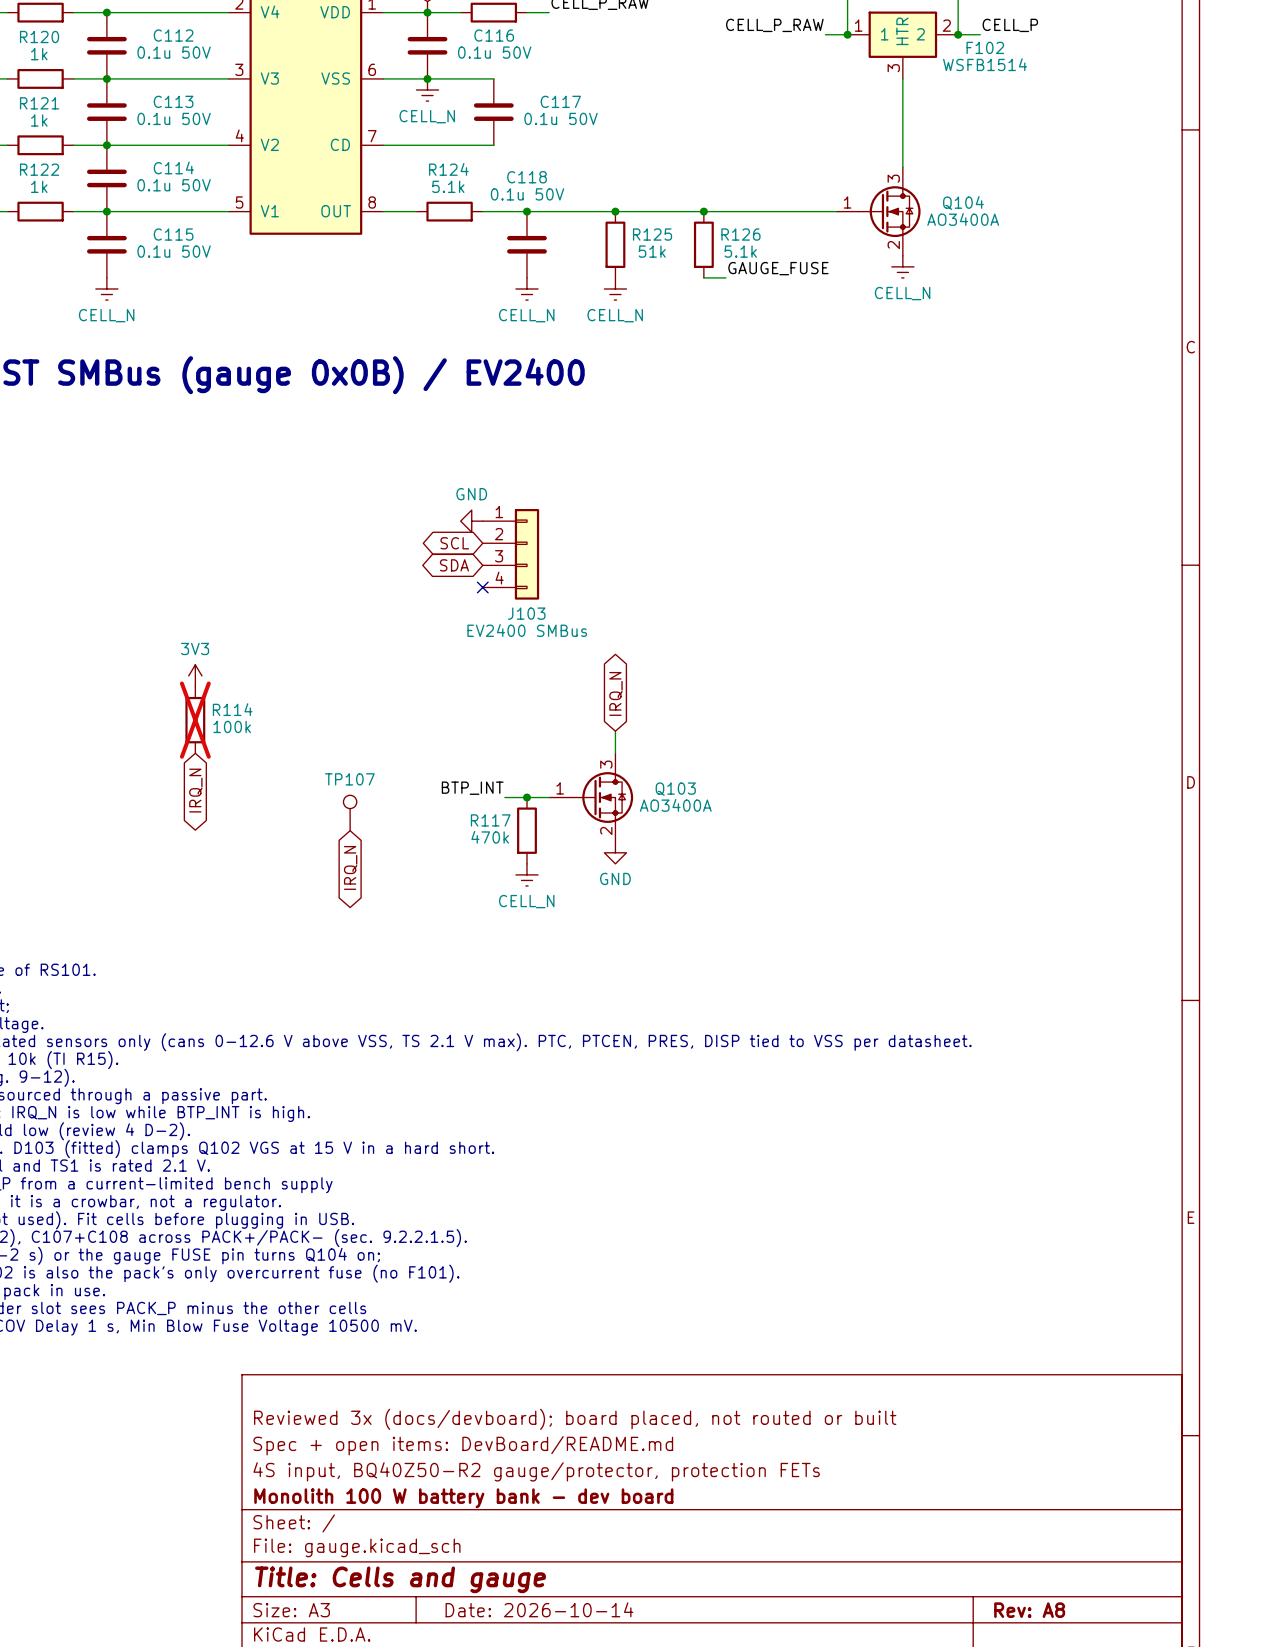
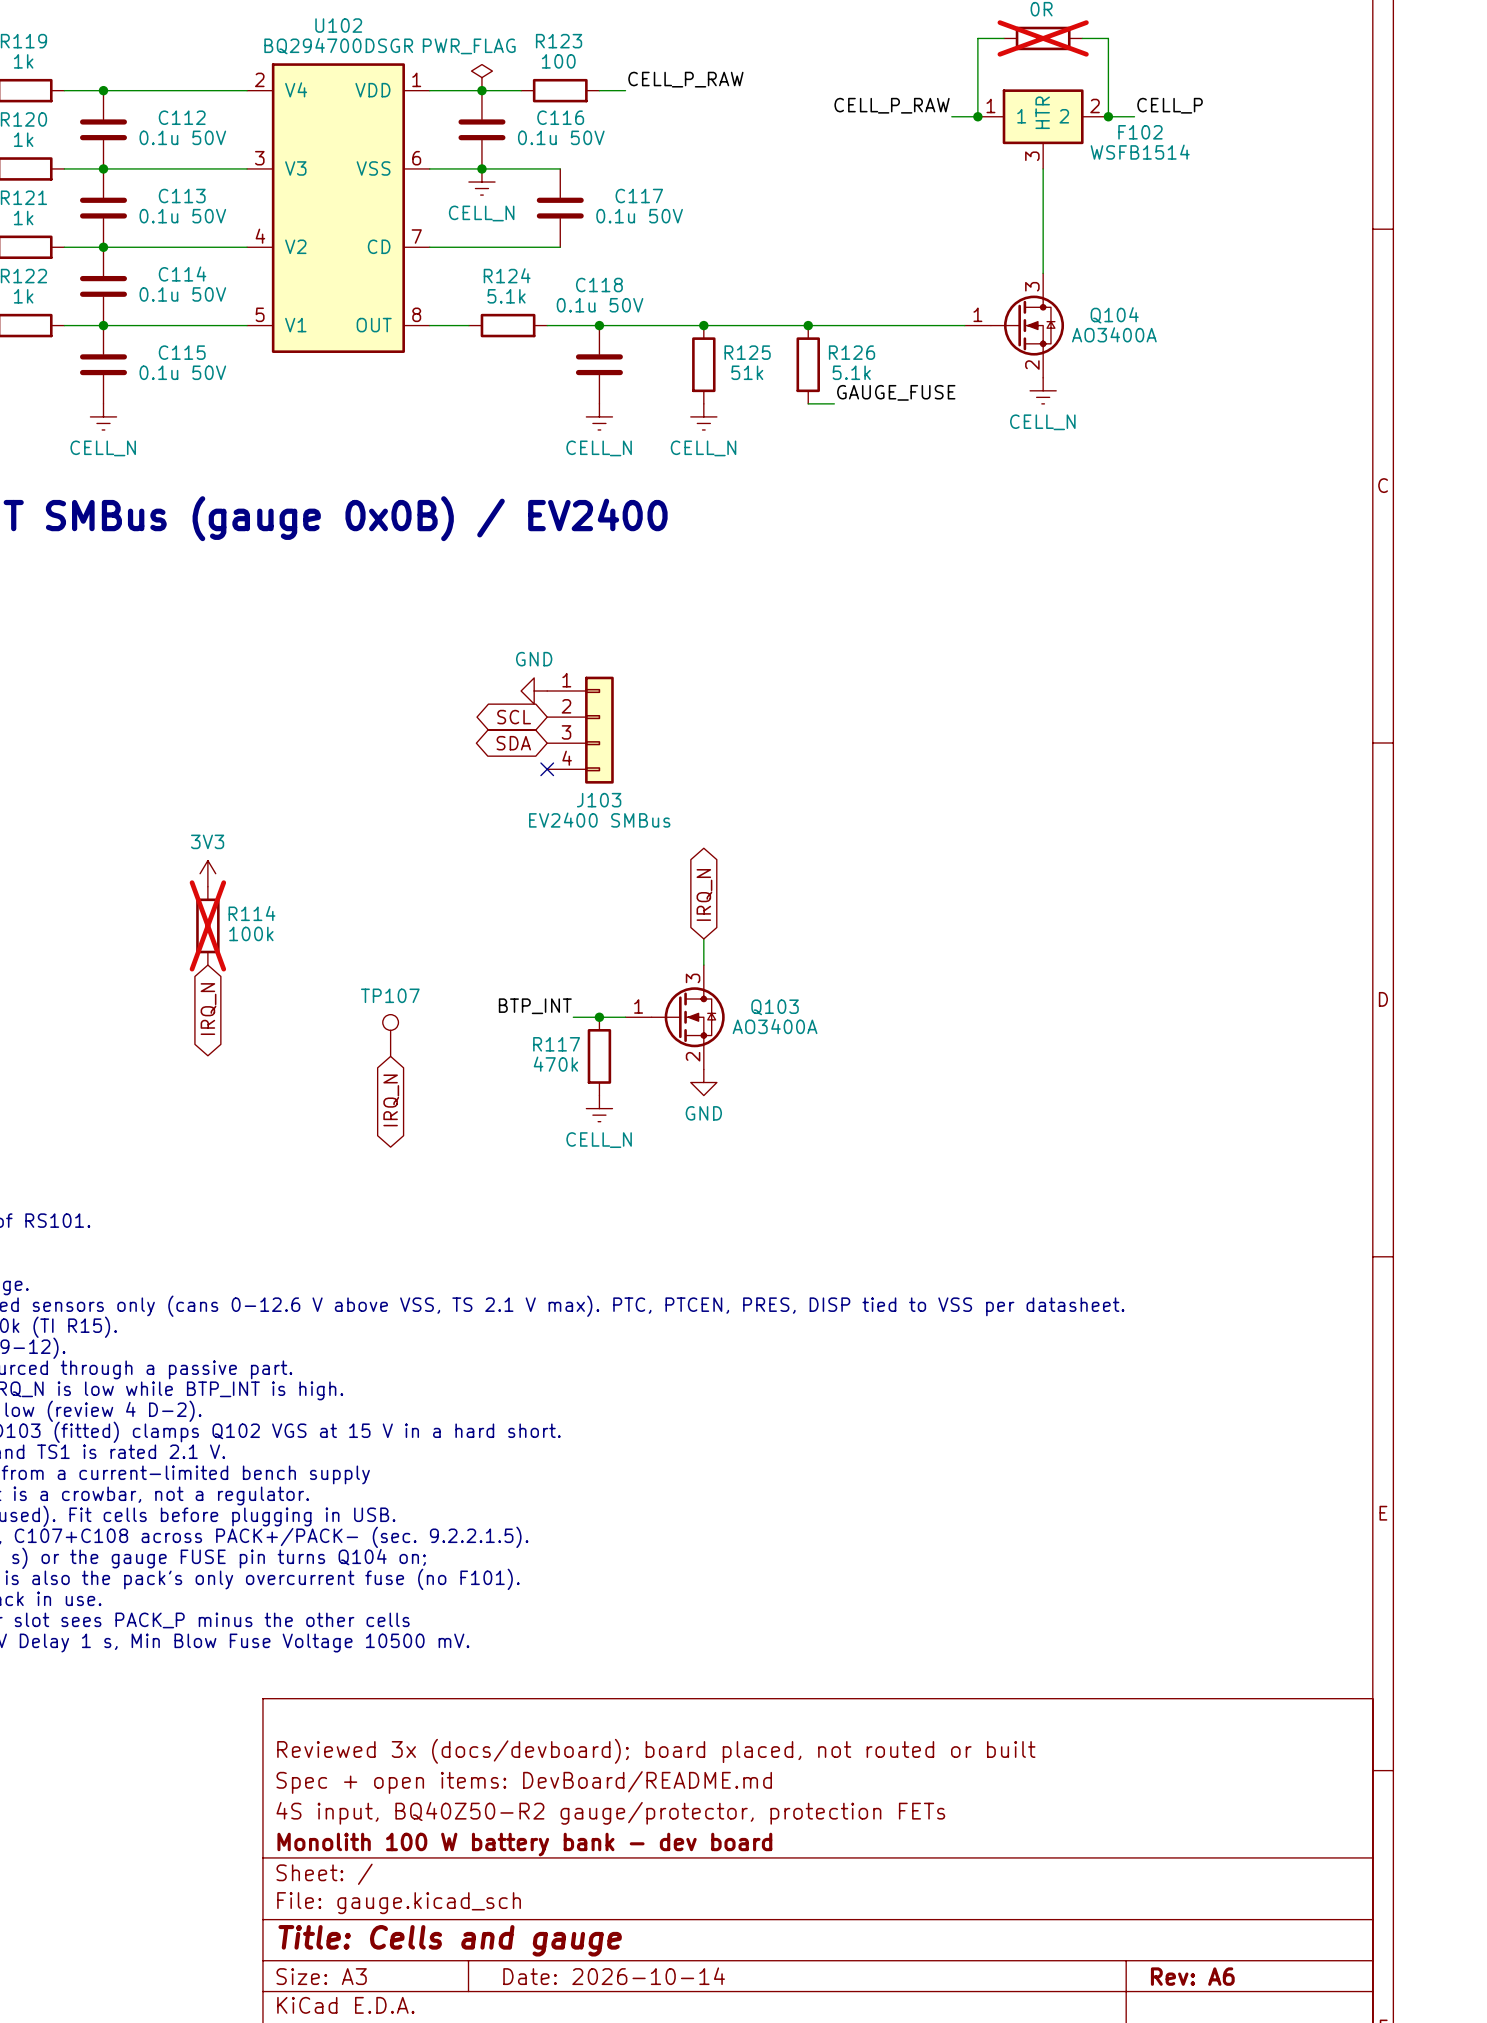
title block: Rev: A8 (1029, 1610) -> Rev: A6 (1192, 1976)

